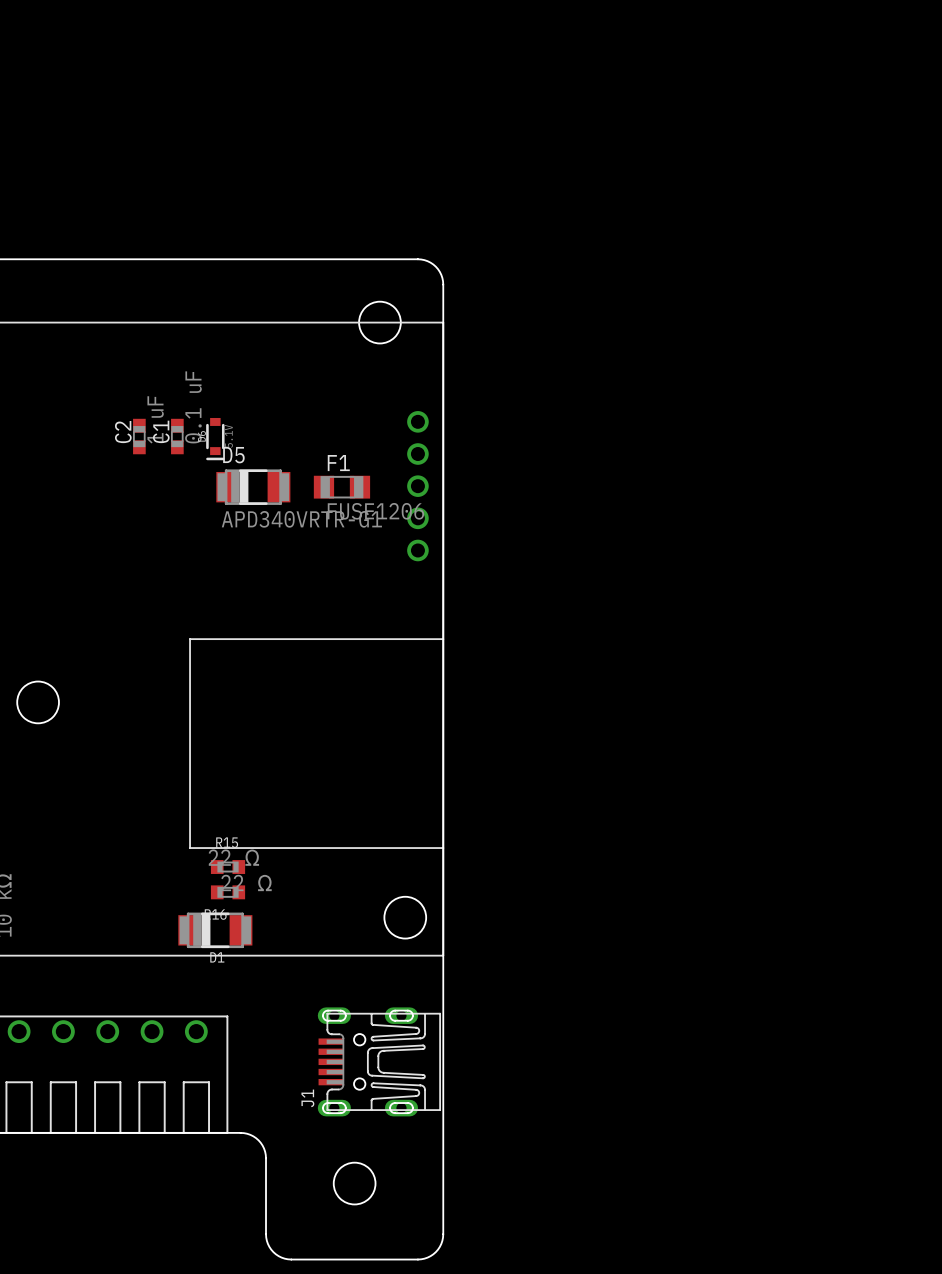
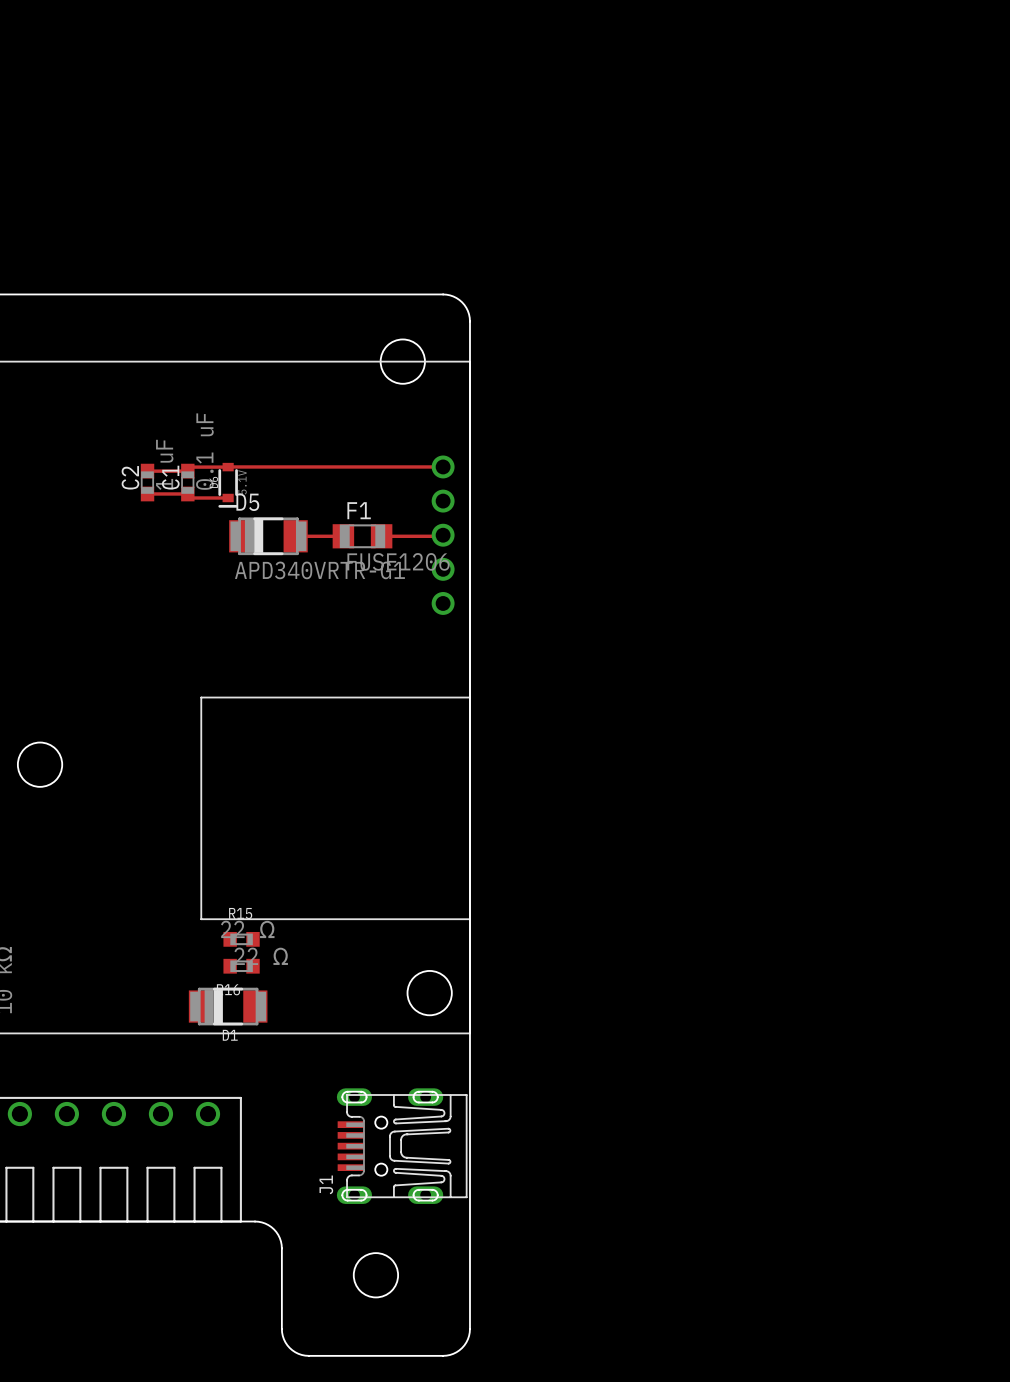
track: none -> (228, 466) (443, 466)
track: none -> (228, 467) (191, 467) (187, 471) (147, 471)
track: none -> (147, 493) (187, 493) (191, 498) (228, 498)
track: none -> (443, 535) (381, 536)
track: none -> (295, 536) (343, 536)

